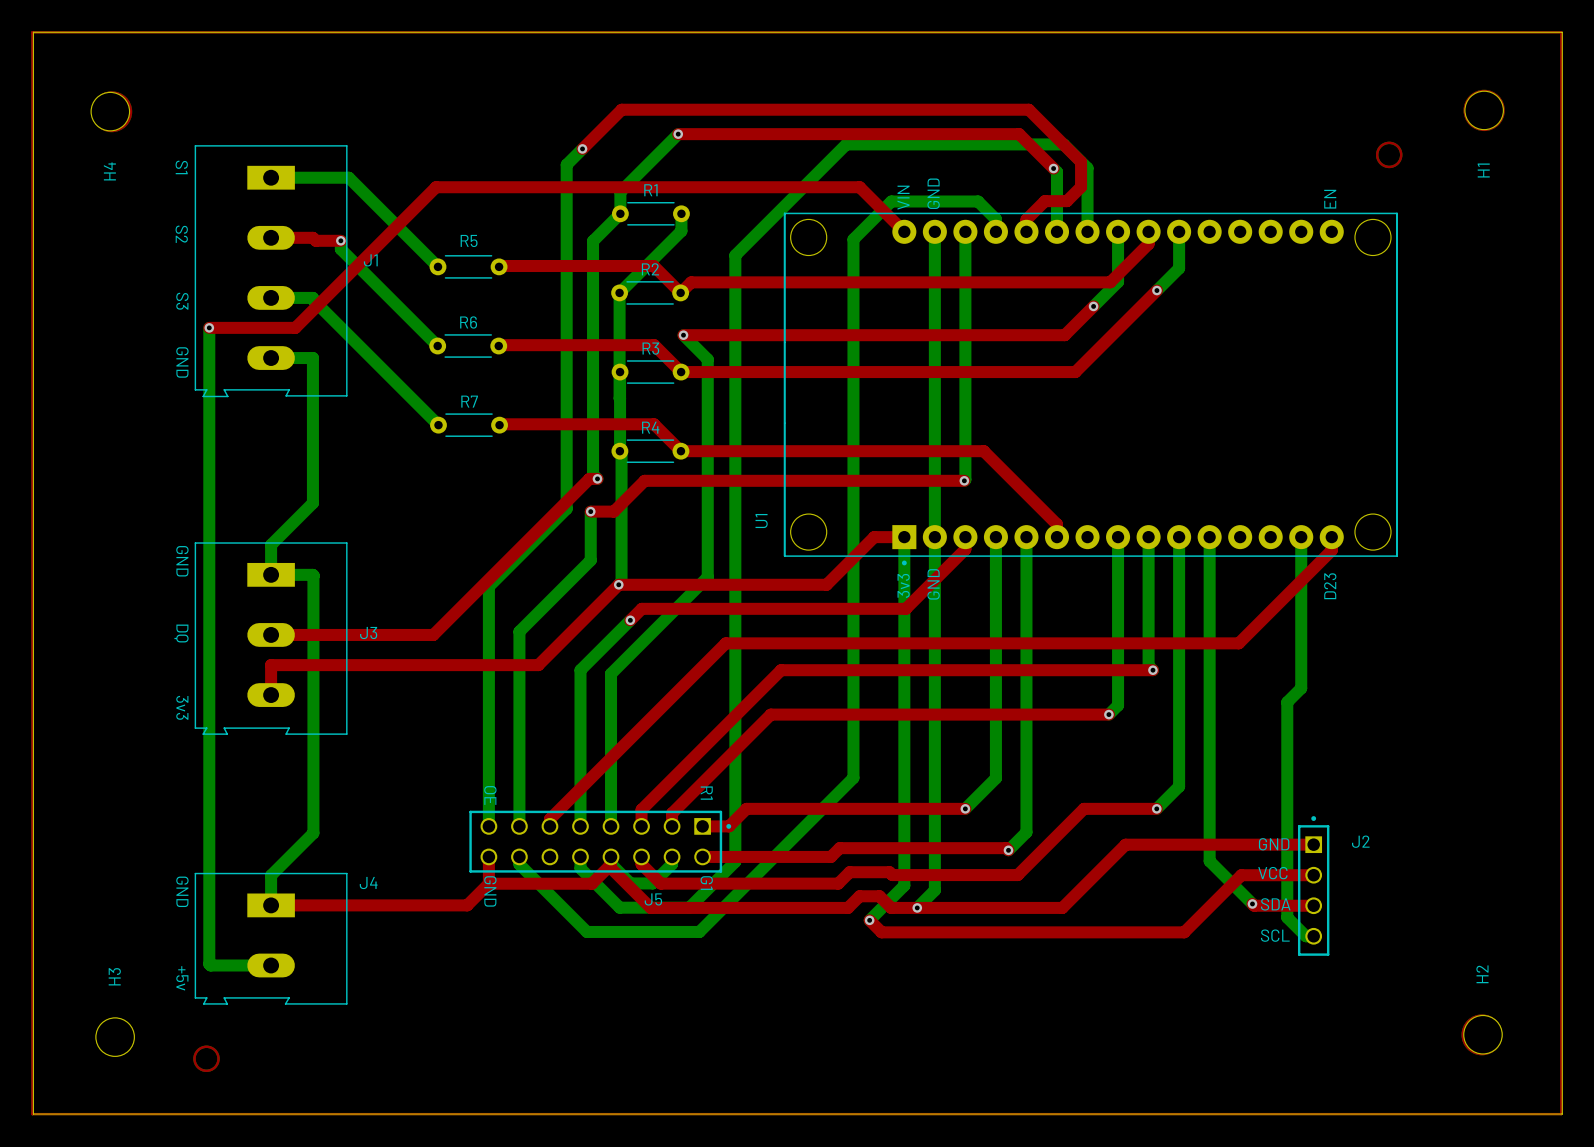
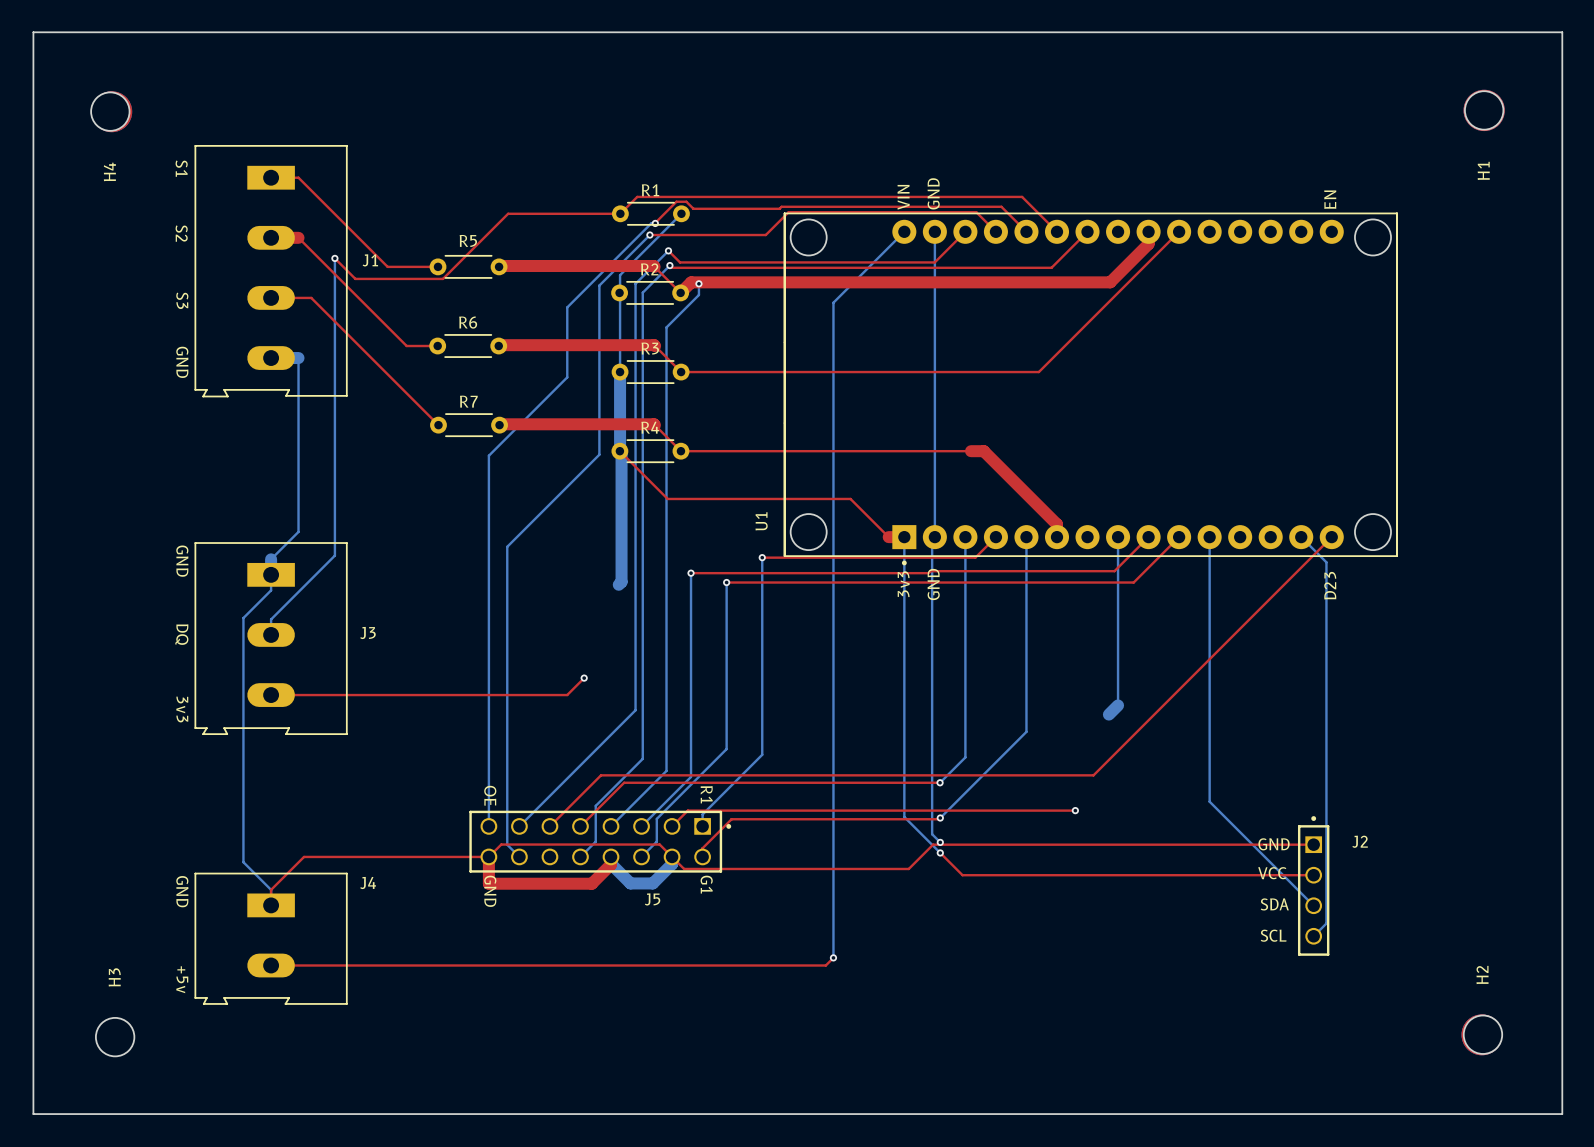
top track: (32, 32) (1561, 32) (1561, 1114) (32, 1114) (32, 32) -> none
top track: (678, 134) (1019, 134) (1053, 168) -> none
bottom track: (678, 134) (620, 191) (620, 213) (593, 241) (593, 474) (597, 478) -> none
via: (678, 134) -> none
drawing: [1375, 141, 1403, 169] -> none
top track: (582, 148) (621, 109) (1028, 109) (1081, 161) (1081, 187) (1066, 201) (1044, 201) (1026, 219) (1026, 231) -> (655, 223) (676, 201) (686, 201) (693, 208) (1001, 206) (1026, 231)
bottom track: (582, 148) (566, 164) (566, 508) (488, 586) -> (655, 223) (651, 223) (567, 307) (567, 377) (488, 455) (488, 586)
via: (582, 148) -> none
bottom track: (1053, 168) (1056, 171) (1056, 231) -> none
via: (1053, 168) -> none
top track: none -> (271, 177) (298, 177) (387, 266) (438, 266)
bottom track: (271, 177) (348, 177) (438, 266) -> none
bottom track: (681, 213) (681, 231) (619, 292) (620, 398) -> (681, 213) (620, 275) (620, 372)
via: none -> (655, 223)
top track: (904, 231) (859, 187) (436, 187) (295, 327) (209, 327) -> none
bottom track: none -> (904, 231) (833, 302) (833, 957)
bottom track width: thick (934, 231) (934, 537) -> thin (934, 231) (934, 537)
top track: none -> (965, 231) (934, 262) (680, 262) (668, 250)
bottom track: (965, 231) (964, 480) -> none
top track: none -> (995, 231) (976, 212) (788, 212) (765, 235) (649, 235)
bottom track: (995, 231) (995, 219) (978, 201) (891, 201) (853, 239) (853, 777) (699, 931) (586, 931) (519, 864) (519, 856) -> (649, 235) (599, 285) (599, 454) (507, 546) (507, 844) (519, 856)
top track: none -> (1056, 231) (1022, 196) (637, 196) (620, 213) (508, 213) (442, 278) (355, 278) (334, 258)
top track: none -> (1087, 231) (1051, 267) (672, 267) (669, 265)
bottom track: (1087, 231) (1087, 168) (1063, 144) (846, 144) (735, 255) (735, 861) (689, 907) (619, 907) (580, 868) (580, 856) -> (669, 265) (642, 292) (642, 758) (595, 805) (595, 841) (580, 856)
bottom track: (1118, 231) (1118, 281) (1093, 306) -> none
bottom track: (1179, 231) (1179, 268) (1156, 290) -> none
via: none -> (649, 235)
top track: (298, 237) (312, 237) (315, 240) (340, 240) -> (298, 237) (406, 346) (437, 346)
bottom track: (340, 240) (340, 249) (437, 346) -> none
via: (340, 240) -> none
via: none -> (668, 250)
bottom track: none -> (334, 258) (334, 555) (271, 619) (271, 634)
via: none -> (334, 258)
via: none -> (669, 265)
top track width: thick (654, 266) (680, 292) -> thin (654, 266) (680, 292)
via: none -> (698, 283)
top track: (1156, 290) (1075, 372) (1038, 372) -> (1179, 231) (1038, 372)
via: (1156, 290) -> none
top track: none -> (271, 297) (311, 297) (438, 425)
bottom track: (271, 297) (312, 297) (438, 425) -> none
top track: (1093, 306) (1064, 335) (683, 335) -> none
via: (1093, 306) -> none
bottom track: (209, 327) (209, 964) (271, 965) -> none
via: (209, 327) -> none
bottom track: (683, 335) (707, 359) (707, 577) (611, 673) (611, 826) -> (698, 283) (698, 294) (666, 327) (666, 770) (611, 826)
via: (683, 335) -> none
top track width: thick (655, 346) (681, 372) (1038, 372) -> thin (655, 346) (681, 372) (1038, 372)
bottom track: (298, 358) (312, 358) (312, 503) (271, 544) (271, 559) -> (298, 358) (298, 531) (271, 559)
top track width: thick (654, 425) (680, 451) (971, 451) -> thin (654, 425) (680, 451) (971, 451)
top track: none -> (619, 451) (667, 498) (850, 498) (888, 537)
top track: (597, 478) (589, 478) (433, 634) (271, 634) -> none
via: (597, 478) -> none
top track: (964, 480) (644, 480) (613, 511) (590, 511) -> none
via: (964, 480) -> none
bottom track: (590, 511) (590, 560) (519, 631) (519, 826) -> (668, 250) (635, 283) (635, 710) (519, 826)
via: (590, 511) -> none
top track: (888, 537) (874, 537) (826, 584) (618, 584) (538, 665) (271, 665) (271, 695) -> (584, 678) (567, 695) (271, 695)
bottom track width: thick (904, 537) (904, 817) -> thin (904, 537) (904, 817)
bottom track: (934, 537) (934, 890) (917, 907) -> (934, 537) (932, 539) (932, 834) (940, 842)
top track: (965, 537) (965, 549) (905, 608) (641, 608) (630, 620) -> none
bottom track: none -> (965, 537) (965, 757) (940, 782)
top track: none -> (995, 537) (975, 557) (762, 557)
bottom track: (995, 537) (995, 778) (965, 808) -> none
bottom track width: thick (1026, 537) (1026, 731) -> thin (1026, 537) (1026, 731)
bottom track width: thick (1118, 537) (1118, 705) -> thin (1118, 537) (1118, 705)
top track: none -> (1148, 537) (1114, 571) (691, 573)
bottom track: (1148, 537) (1148, 665) (1152, 670) -> none
top track: none -> (1179, 537) (1133, 582) (726, 582)
bottom track: (1179, 537) (1179, 786) (1156, 808) -> none
bottom track width: thick (1209, 537) (1209, 801) -> thin (1209, 537) (1209, 801)
bottom track: (1301, 537) (1301, 688) (1287, 702) (1287, 917) (1305, 936) (1313, 936) -> (1301, 537) (1326, 562) (1326, 923) (1313, 936)
top track: (1331, 537) (1331, 550) (1238, 643) (725, 643) (549, 819) (549, 826) -> (1331, 537) (1093, 775) (601, 775) (549, 826)
bottom track: none -> (762, 557) (762, 754) (702, 814) (702, 826)
via: none -> (762, 557)
bottom track: none -> (691, 573) (691, 776) (641, 826)
via: none -> (691, 573)
bottom track: (271, 574) (313, 575) (313, 833) (271, 875) (271, 889) -> (271, 574) (271, 590) (243, 618) (243, 862) (271, 889)
bottom track: none -> (726, 582) (726, 749) (656, 818) (656, 841) (641, 856)
via: none -> (726, 582)
via: (618, 584) -> none
bottom track width: thick (488, 586) (488, 826) -> thin (488, 586) (488, 826)
bottom track: (630, 620) (580, 670) (580, 826) -> none
via: (630, 620) -> none
top track: (1152, 670) (781, 670) (641, 809) (641, 826) -> none
via: (1152, 670) -> none
via: none -> (584, 678)
top track: (1108, 714) (770, 714) (672, 813) (672, 826) -> (1075, 810) (687, 810) (672, 826)
via: (1108, 714) -> none
bottom track: (1026, 731) (1026, 832) (1008, 850) -> (1026, 731) (940, 818)
top track: none -> (940, 782) (624, 782) (580, 826)
via: none -> (940, 782)
bottom track: (1209, 801) (1209, 861) (1252, 903) -> (1209, 801) (1313, 905)
top track: (965, 808) (746, 808) (729, 826) (702, 826) -> none
via: (965, 808) -> none
top track: (1156, 808) (1083, 808) (1017, 875) (892, 875) (889, 872) (849, 872) (838, 883) (660, 883) (641, 864) (641, 856) -> none
via: (1156, 808) -> none
via: none -> (1075, 810)
bottom track: (904, 817) (904, 885) (869, 920) -> (904, 817) (940, 852)
via: none -> (940, 818)
via: none -> (940, 842)
top track: (1125, 844) (1062, 907) (891, 907) (879, 896) (859, 896) (848, 907) (650, 907) (609, 866) -> (1125, 844) (933, 844) (908, 868) (684, 868) (659, 844) (501, 844) (488, 856) (304, 856) (271, 889) (271, 905)
top track width: thick (1125, 844) (1313, 844) -> thin (1125, 844) (1313, 844)
top track: (1008, 850) (1006, 848) (839, 848) (830, 856) (702, 856) -> (940, 818) (731, 819) (702, 848) (702, 856)
via: (1008, 850) -> none
via: none -> (940, 852)
top track: (1241, 875) (1184, 932) (881, 932) (869, 920) -> (1241, 875) (962, 875) (940, 852)
top track width: thick (1241, 875) (1313, 875) -> thin (1241, 875) (1313, 875)
top track: (488, 883) (467, 905) (271, 905) -> none
top track: (1252, 903) (1254, 905) (1313, 905) -> none
via: (1252, 903) -> none
via: (917, 907) -> none
via: (869, 920) -> none
top track: none -> (833, 957) (825, 965) (271, 965)
via: none -> (833, 957)
drawing: [193, 1045, 220, 1072] -> none

